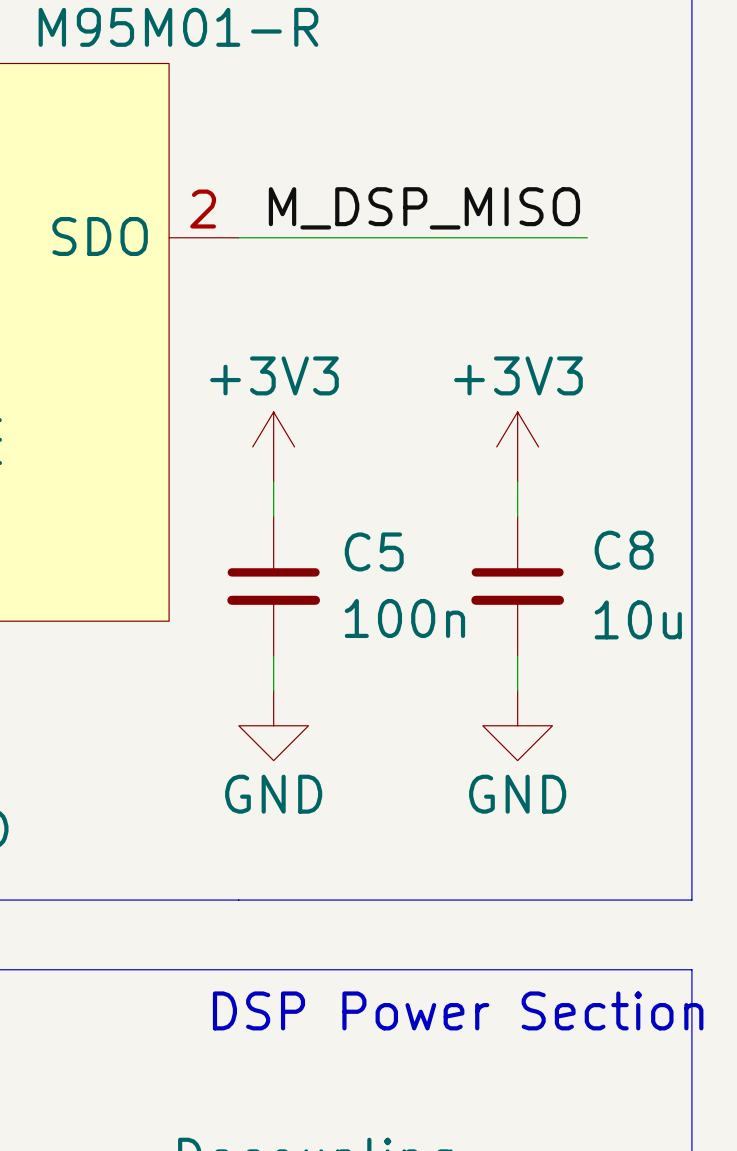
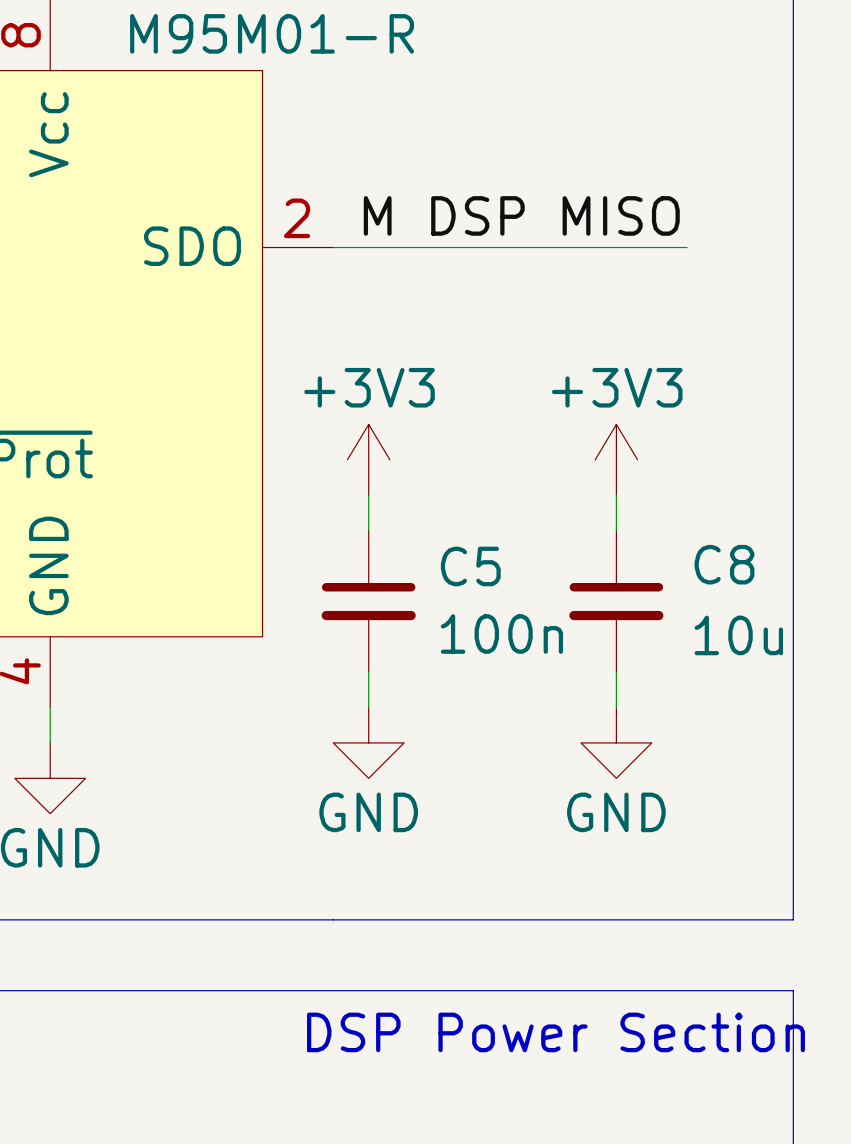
label: M_DSP_MISO (424, 208) -> M DSP MISO (521, 215)

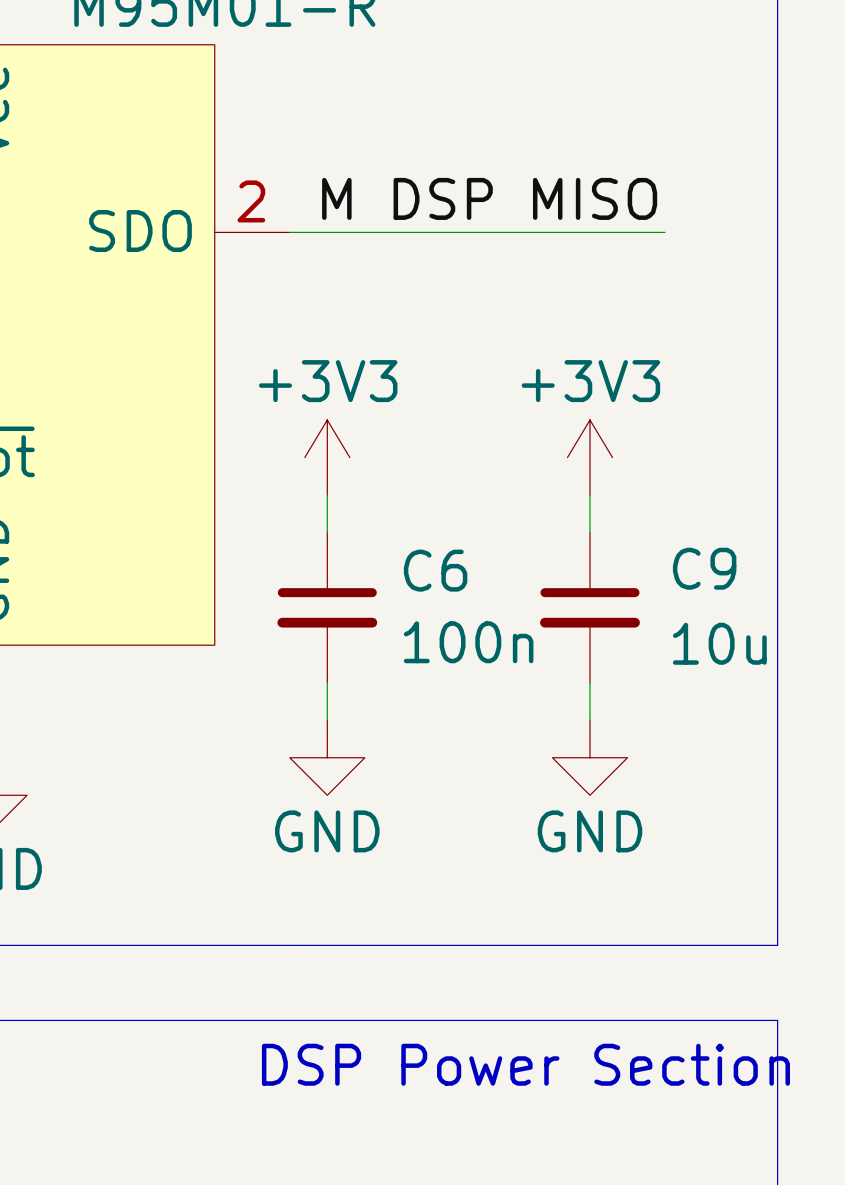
C8 name: C8 (724, 564) -> C9 (704, 568)
C5 name: C5 (470, 566) -> C6 (435, 570)

